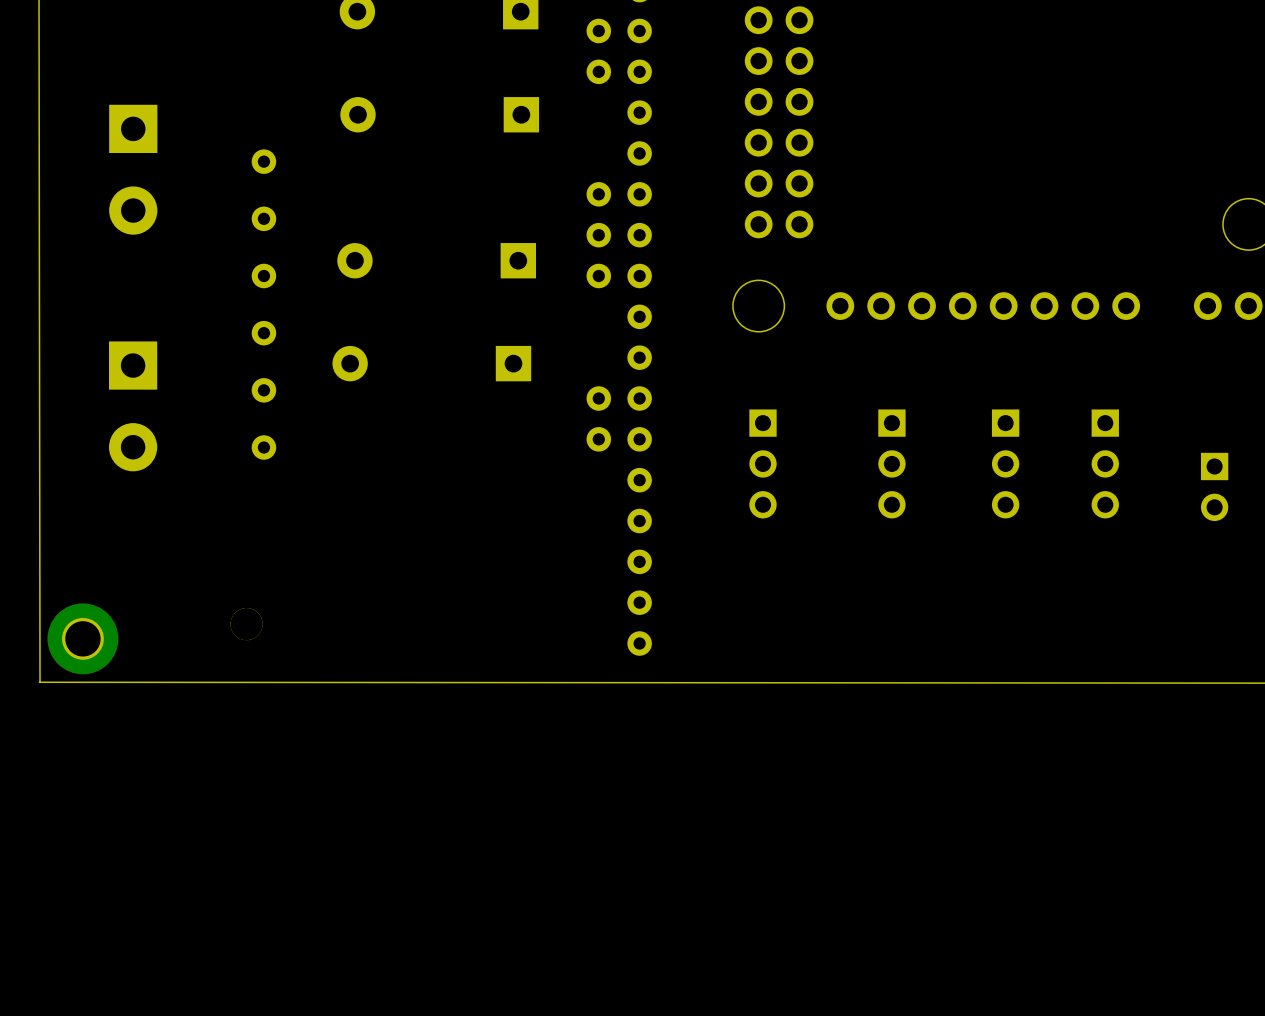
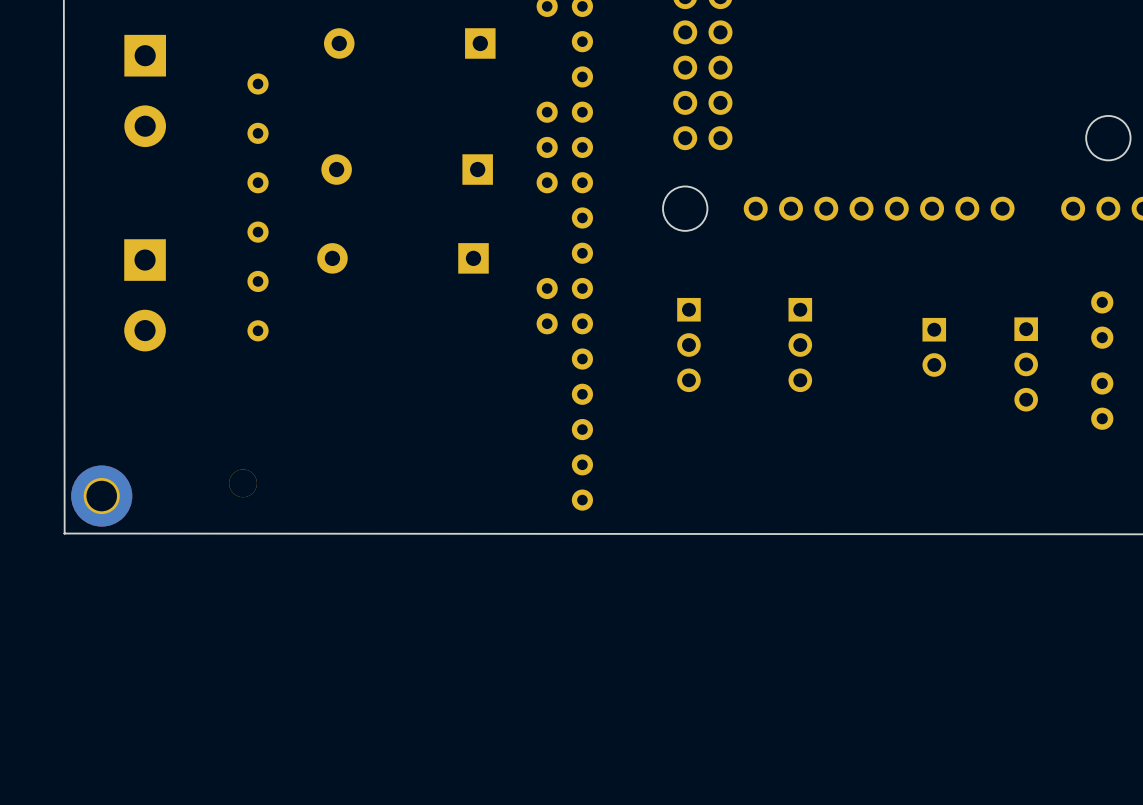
part: none -> (1102, 320)
part: (1005, 463) -> none
part position: (1105, 463) -> (1026, 364)
part position: (1214, 486) -> (934, 347)
part: none -> (1102, 401)

